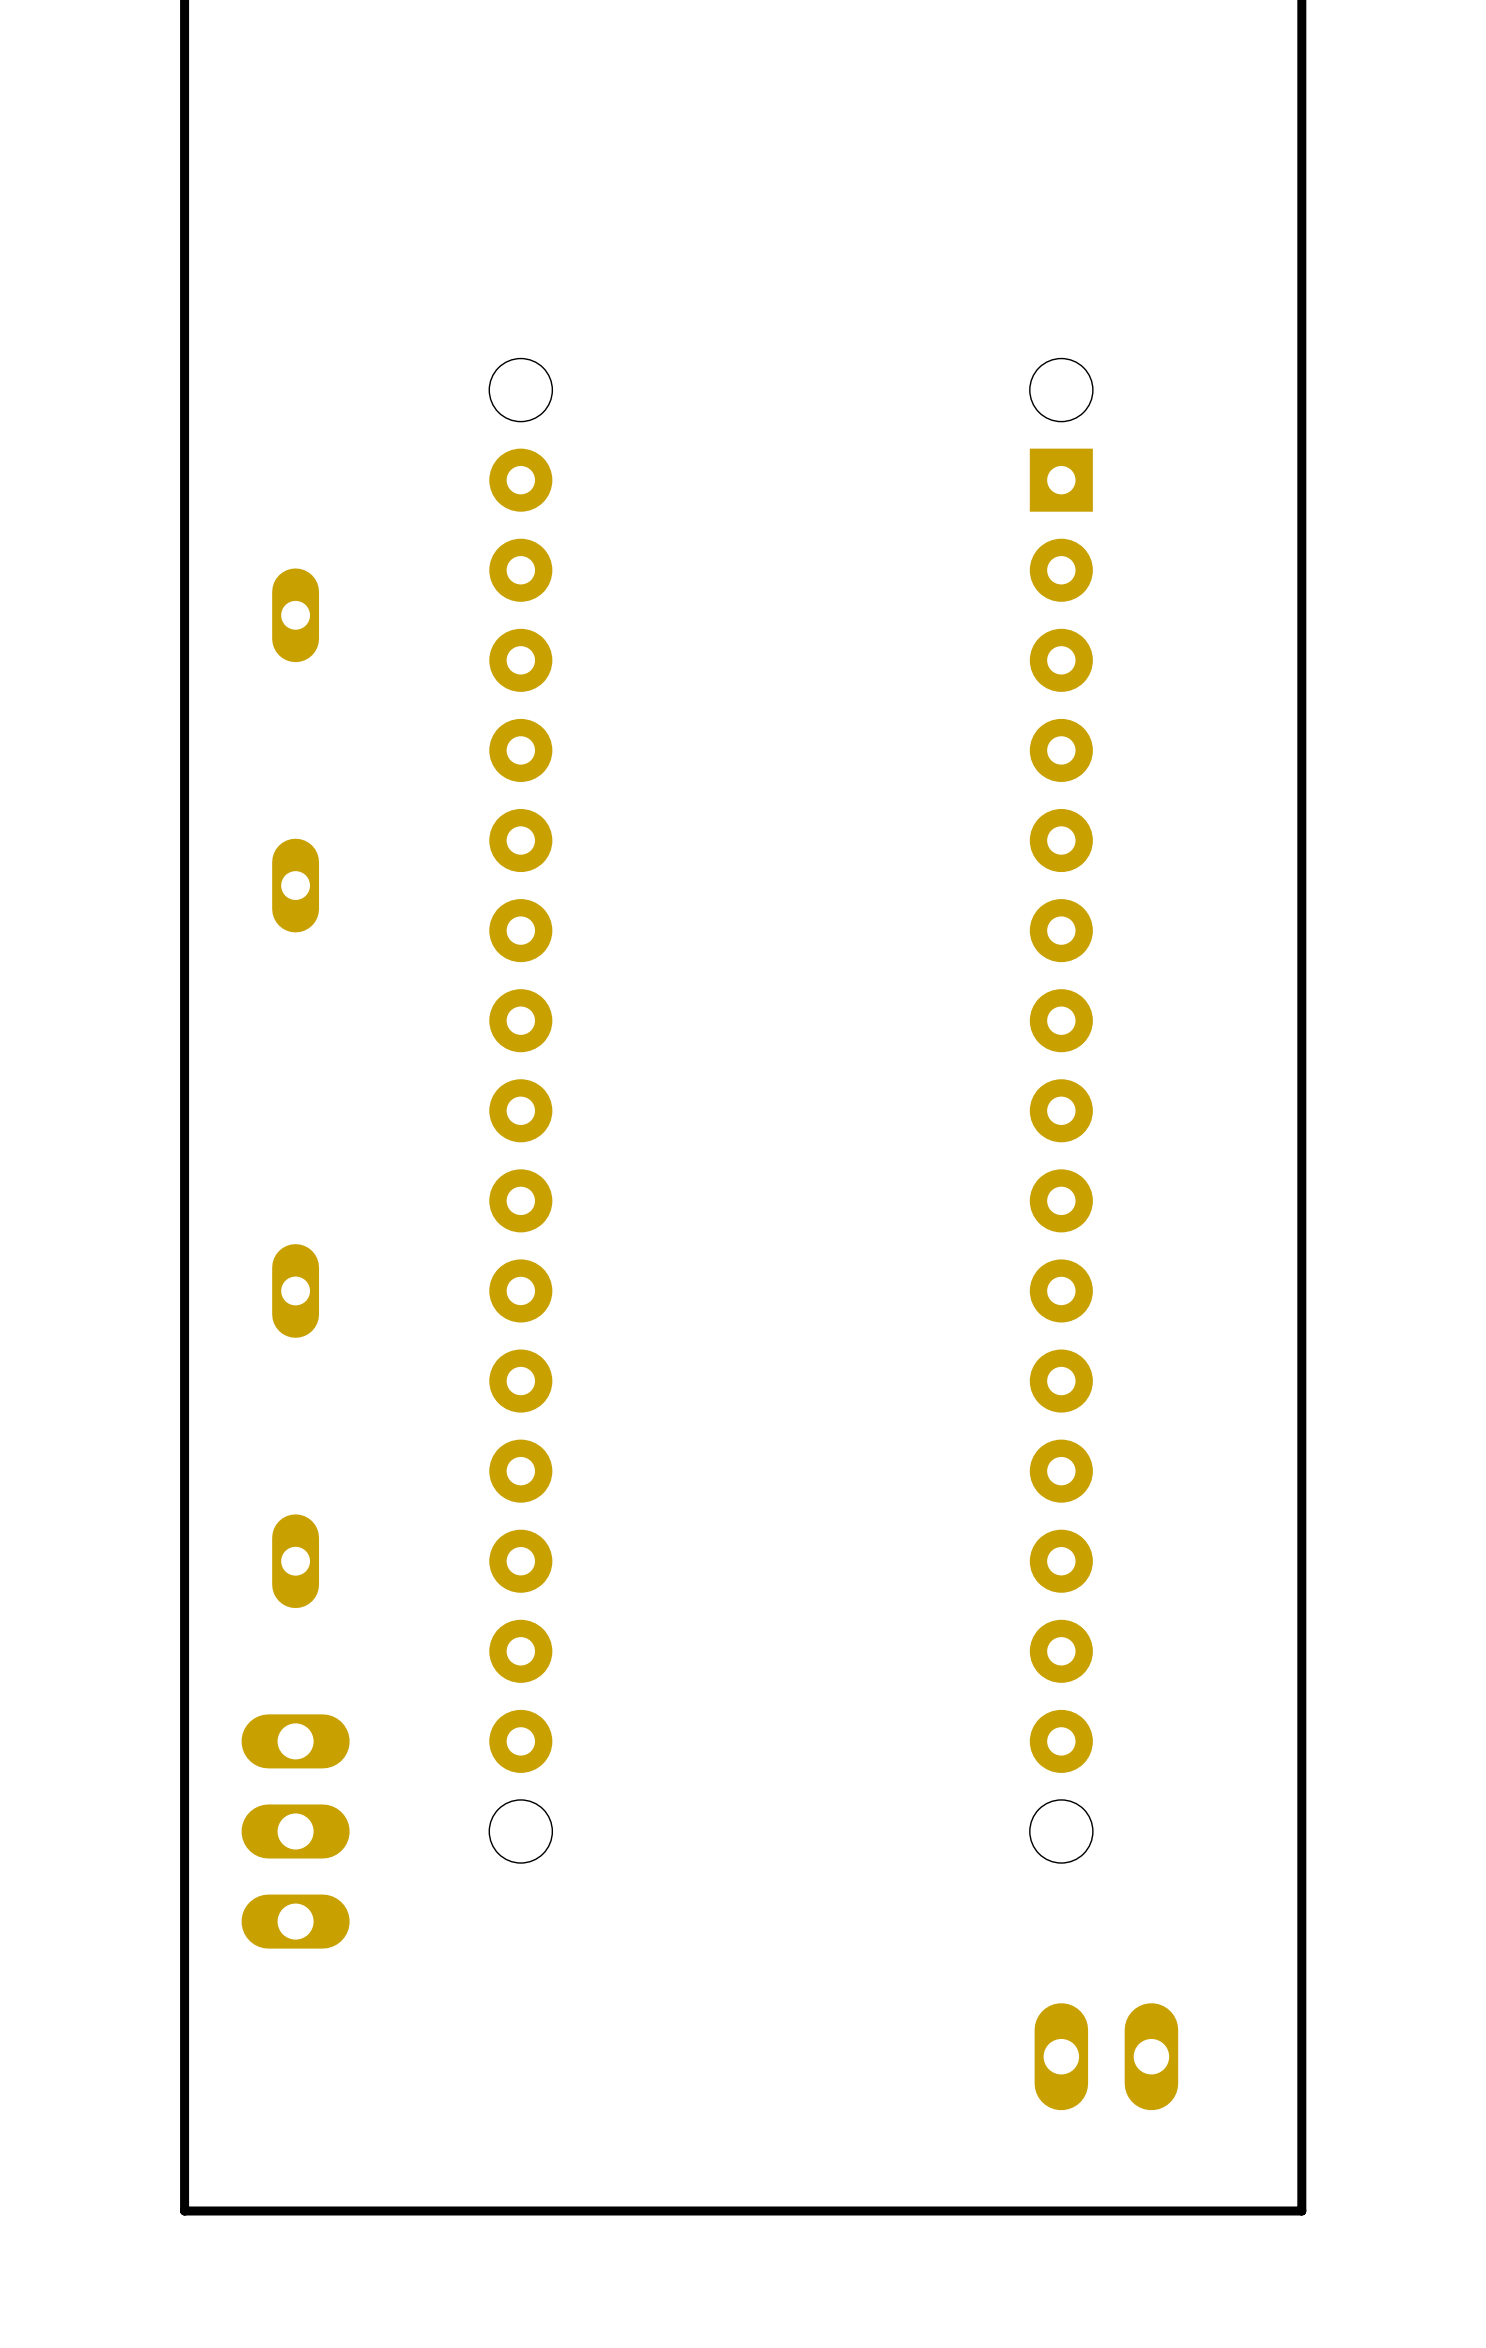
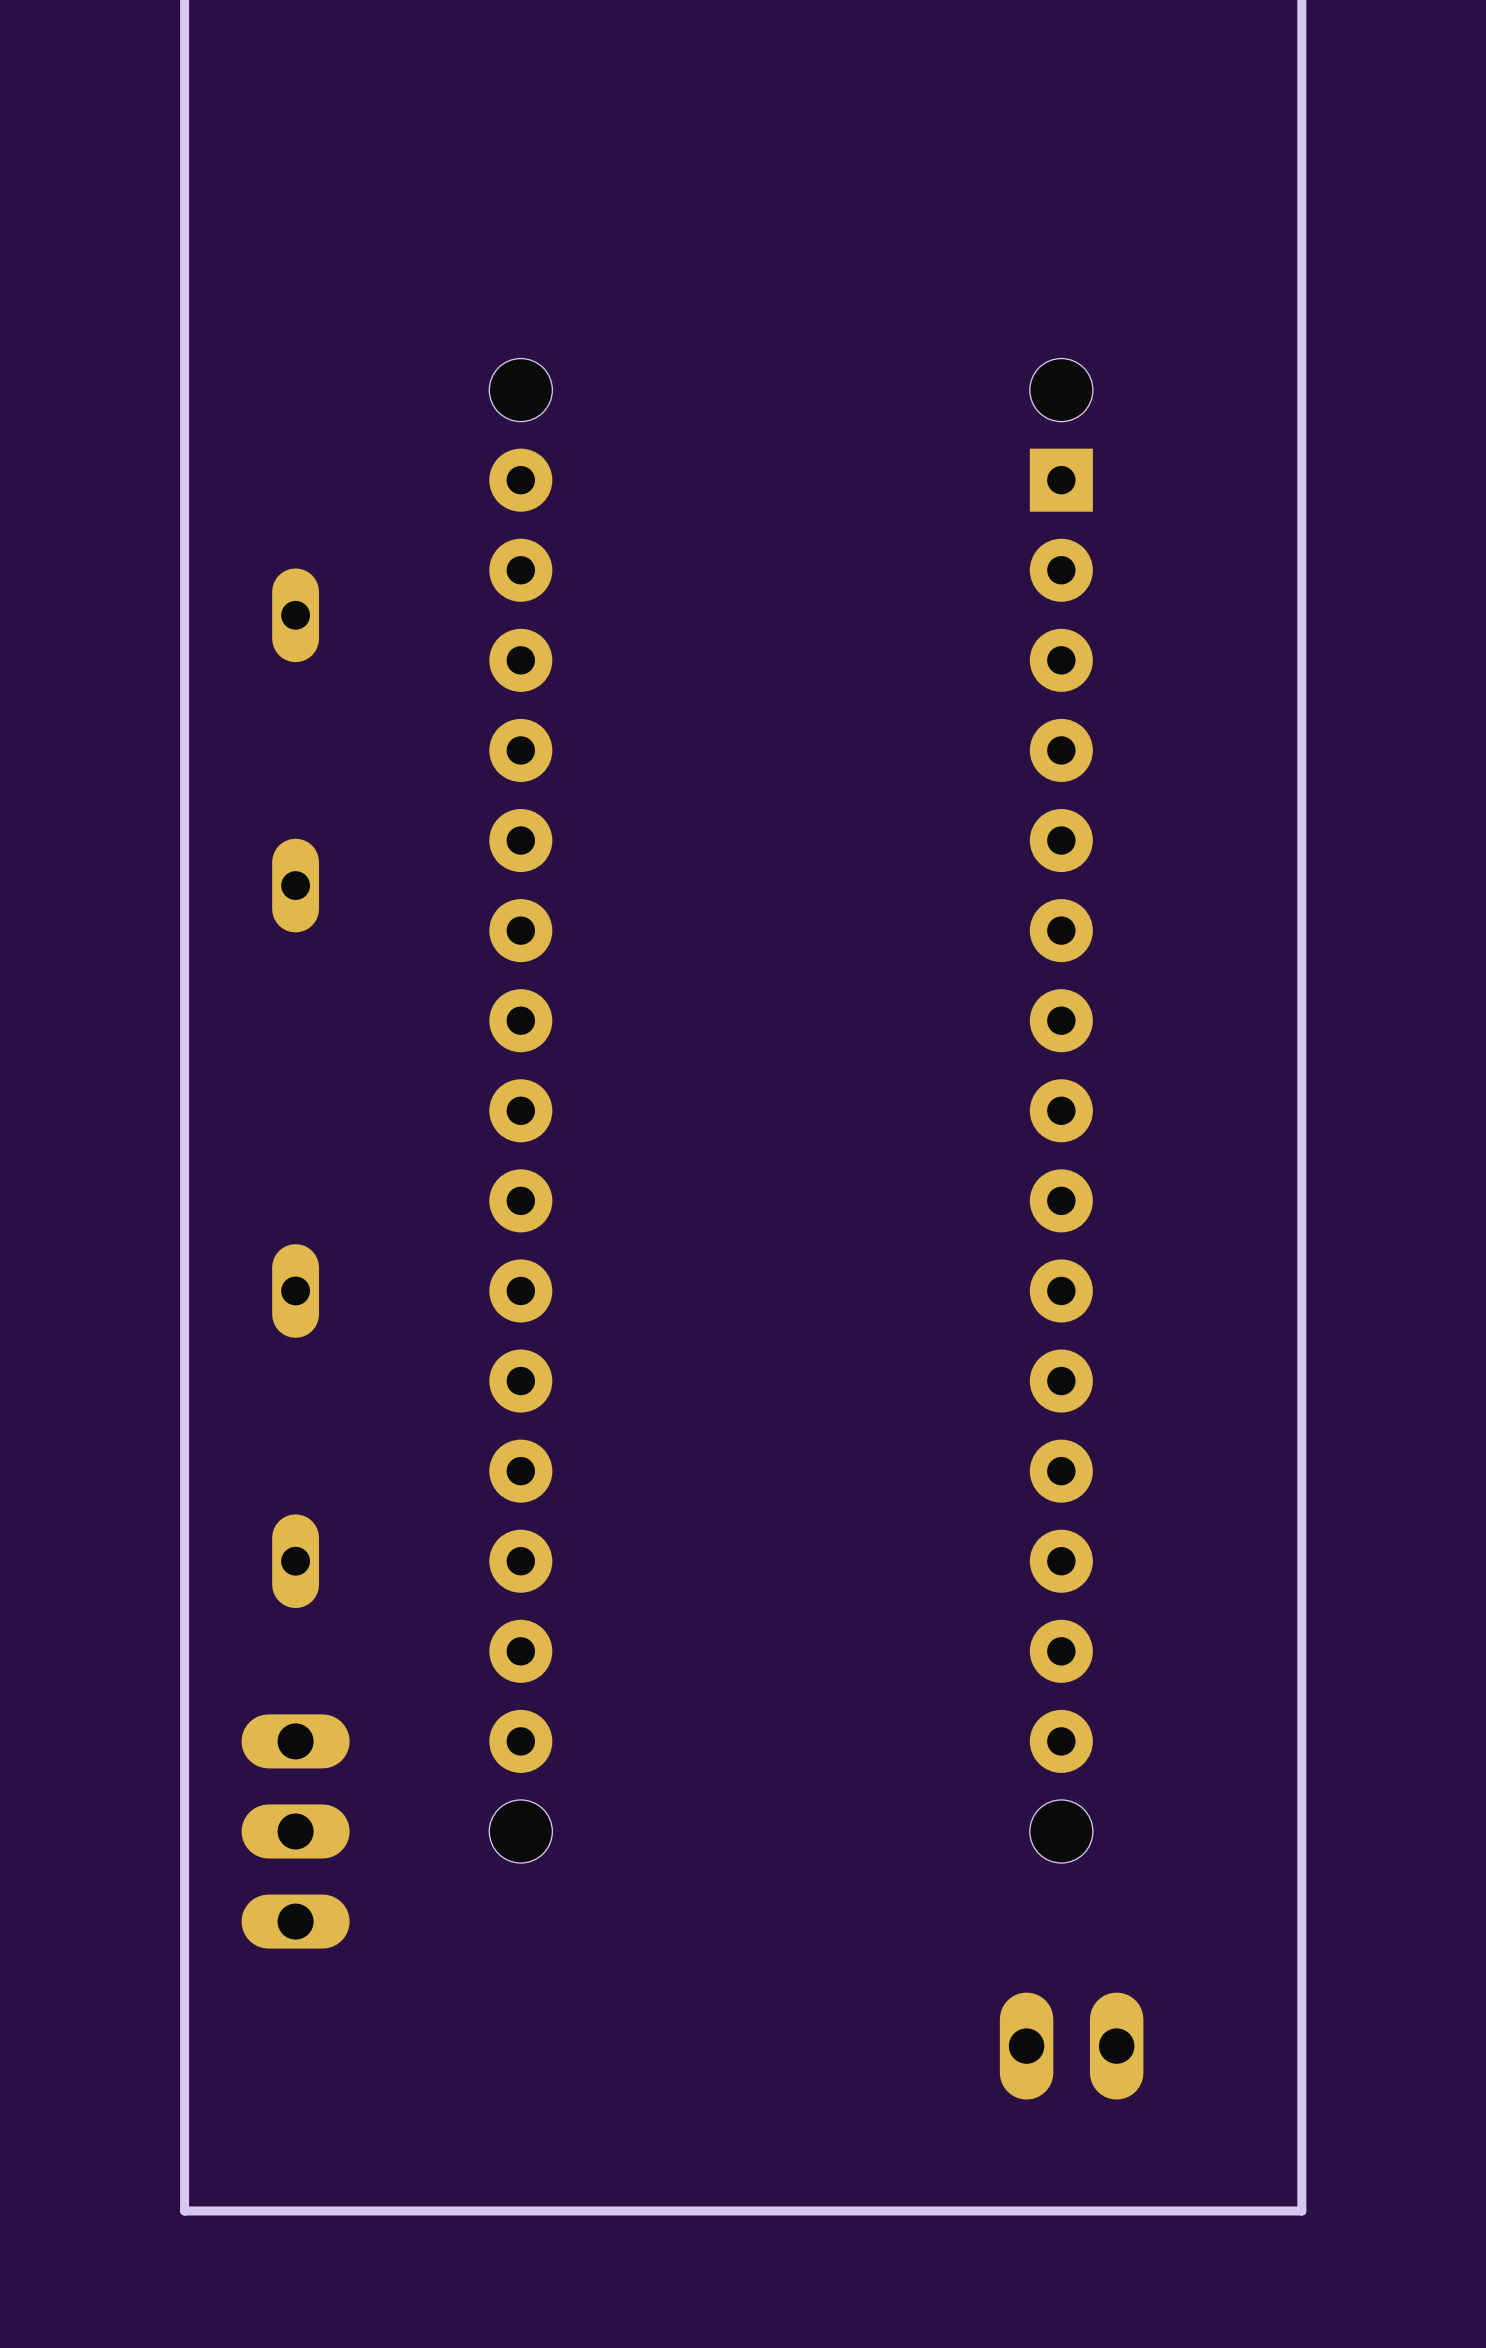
part position: (1106, 2056) -> (1071, 2046)

